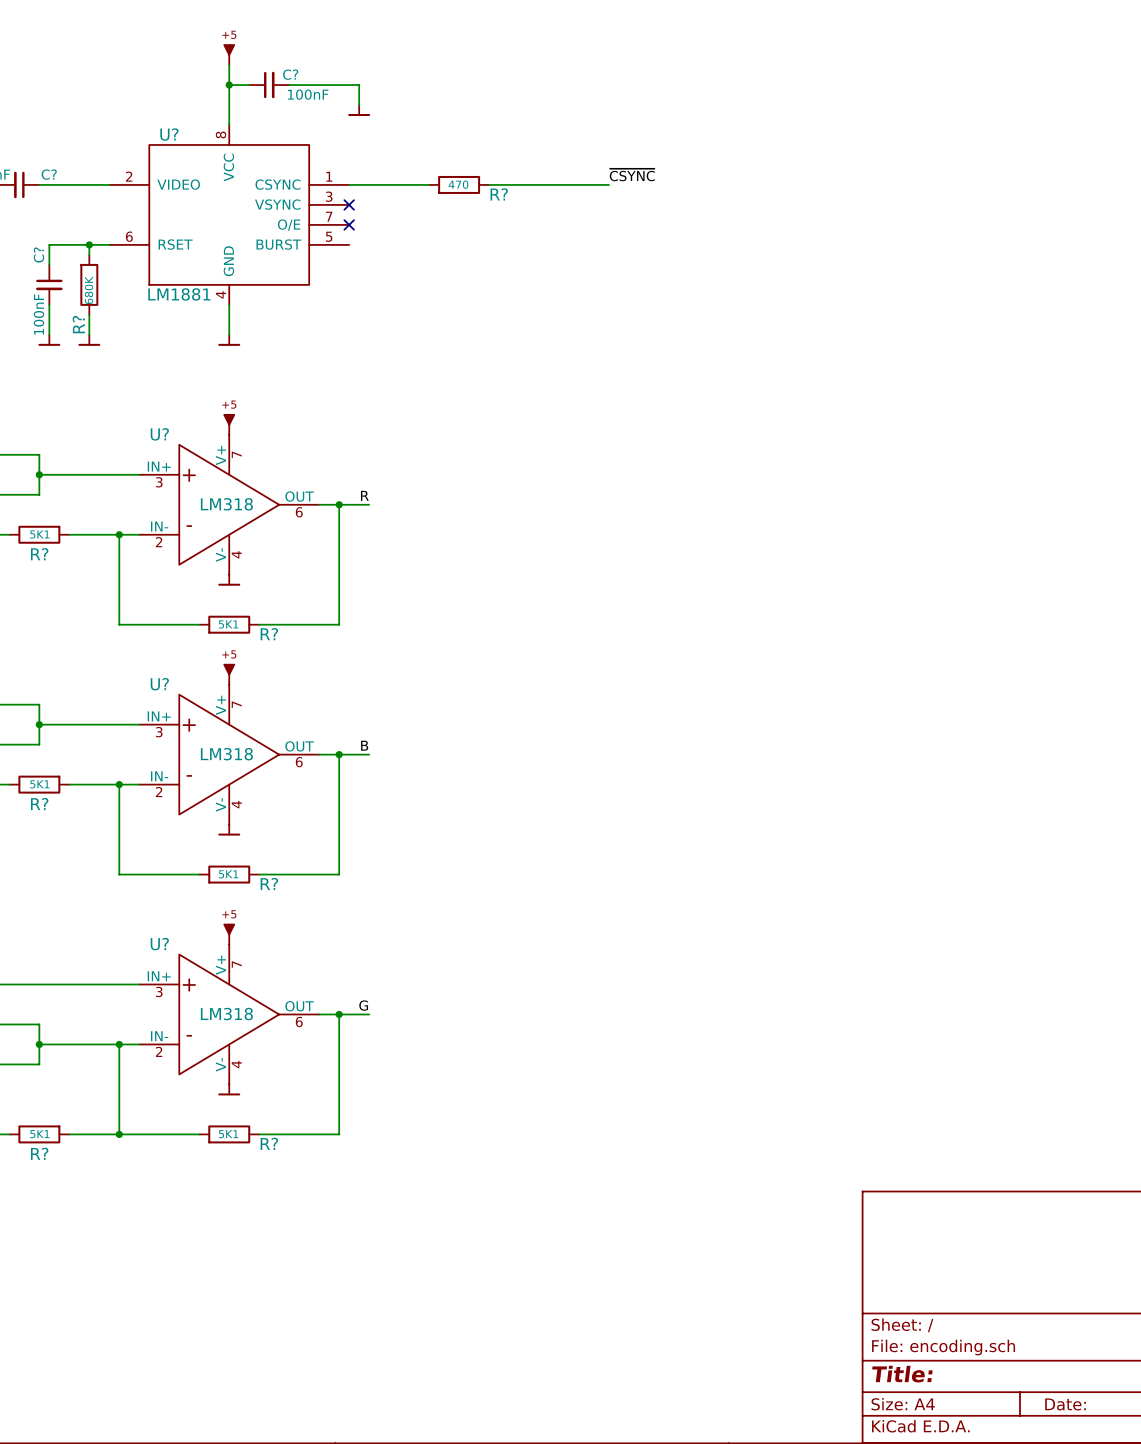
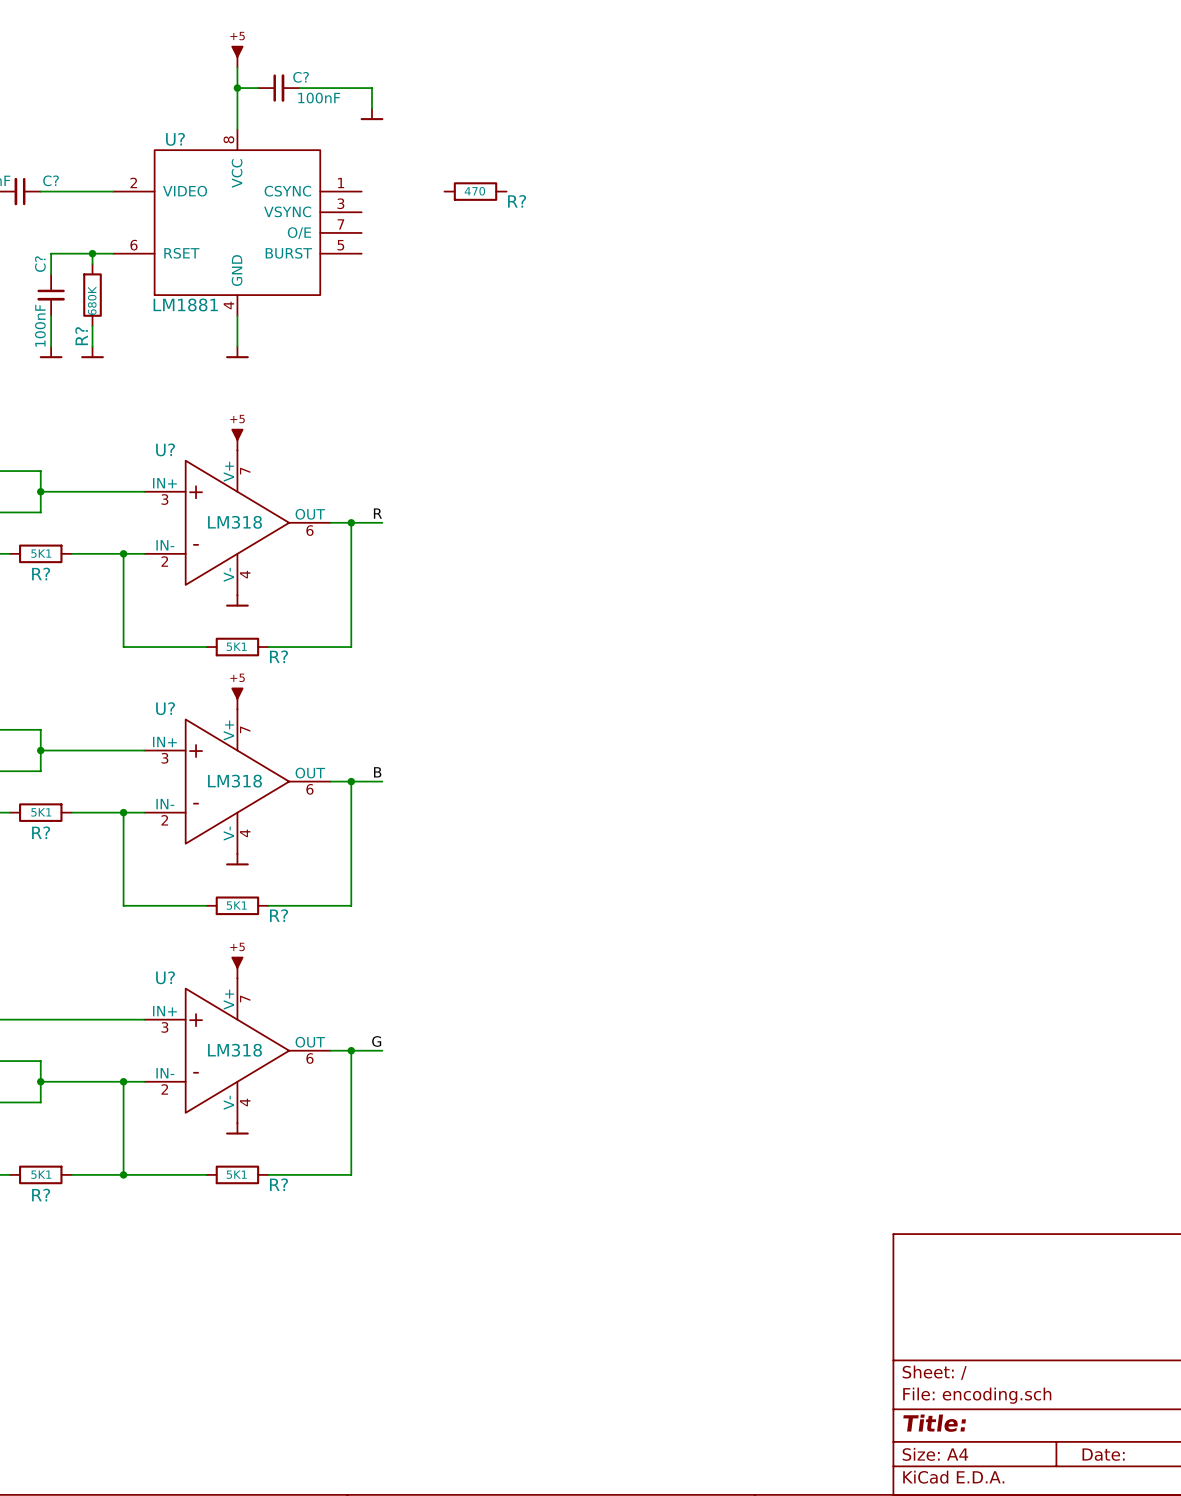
label: ~{CSYNC} (632, 174) -> none
wire: (349, 184) (429, 184) -> none
wire: (489, 184) (609, 184) -> none
no-connect mark: (349, 204) -> none
no-connect mark: (349, 224) -> none

